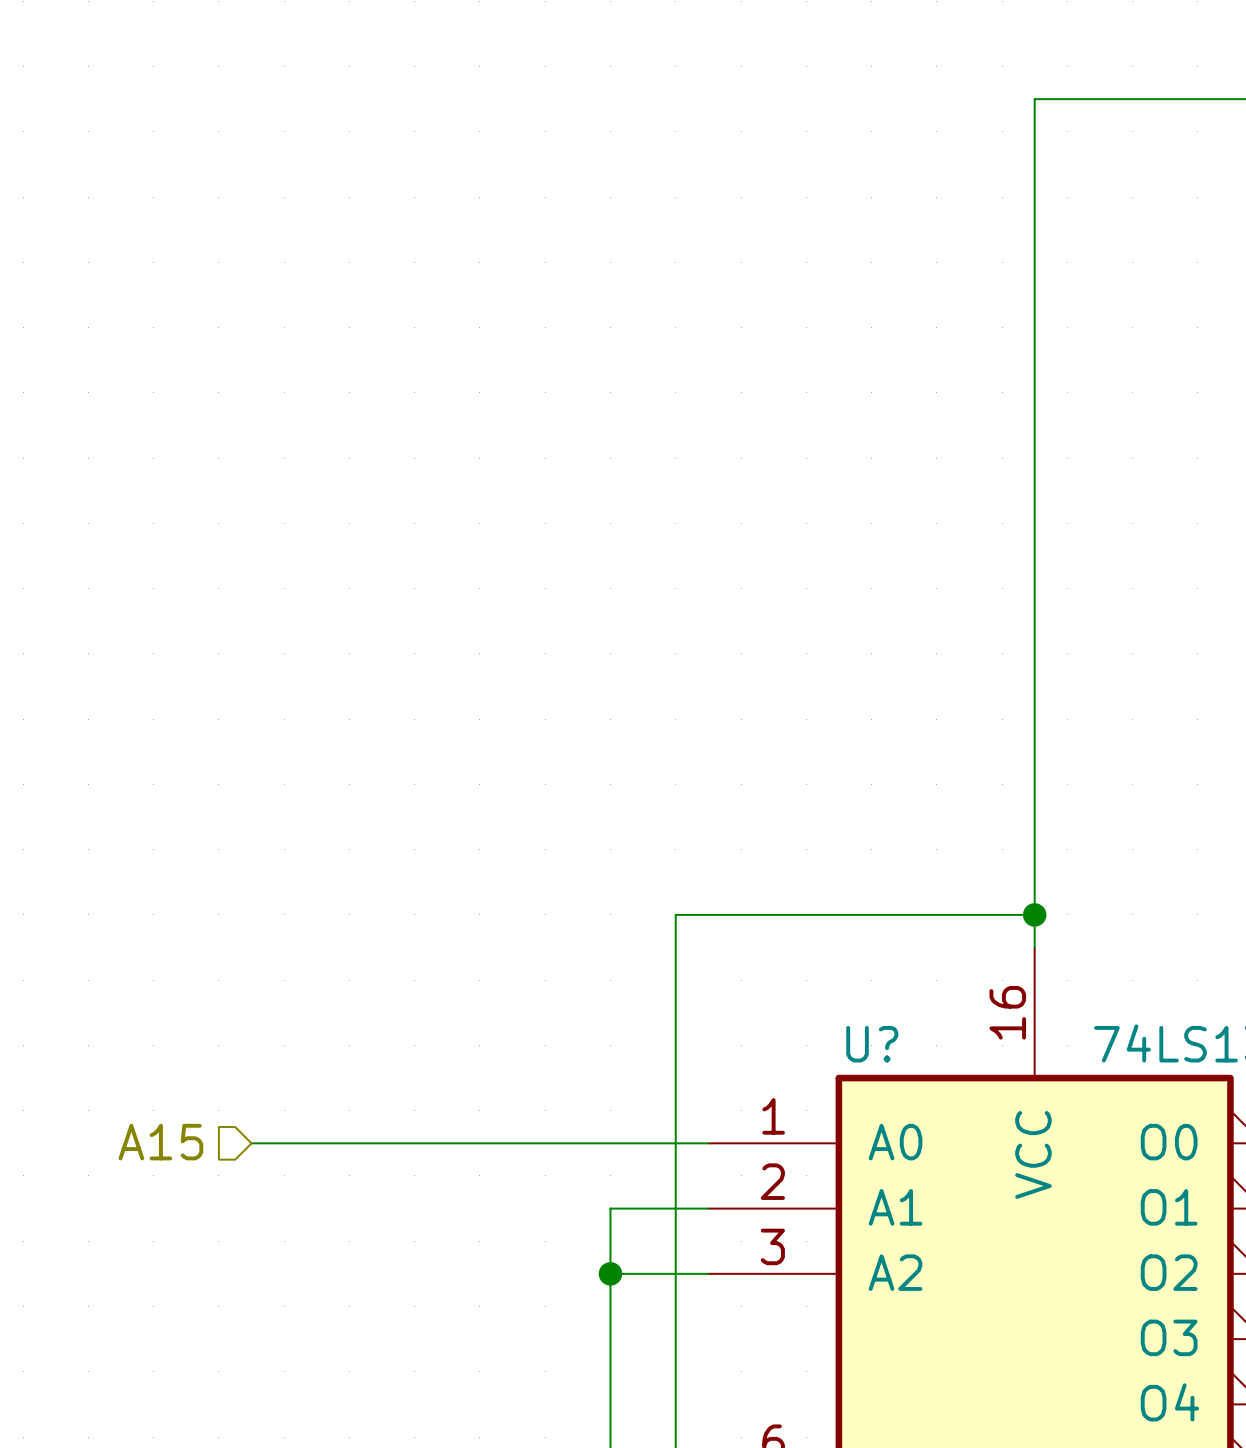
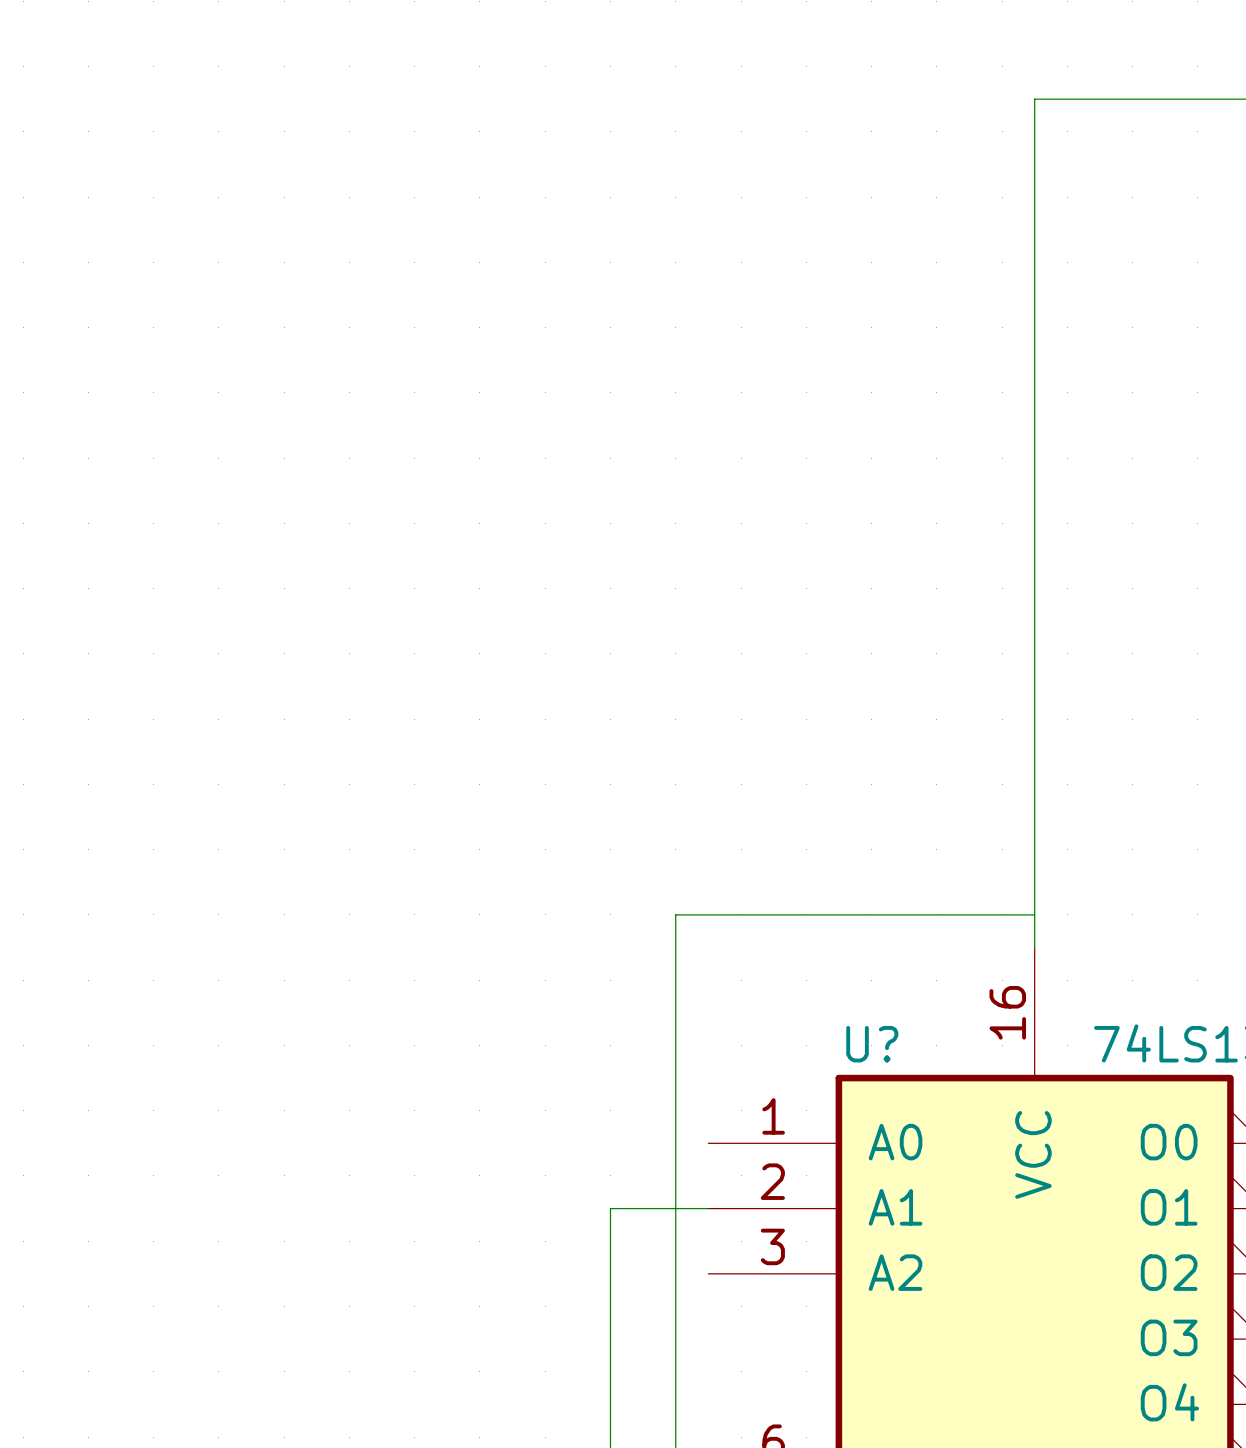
junction: (1034, 914) -> none
hierarchical label: A15 (160, 1142) -> none
wire: (251, 1143) (708, 1143) -> none
wire: (610, 1273) (708, 1273) -> none
junction: (610, 1273) -> none

